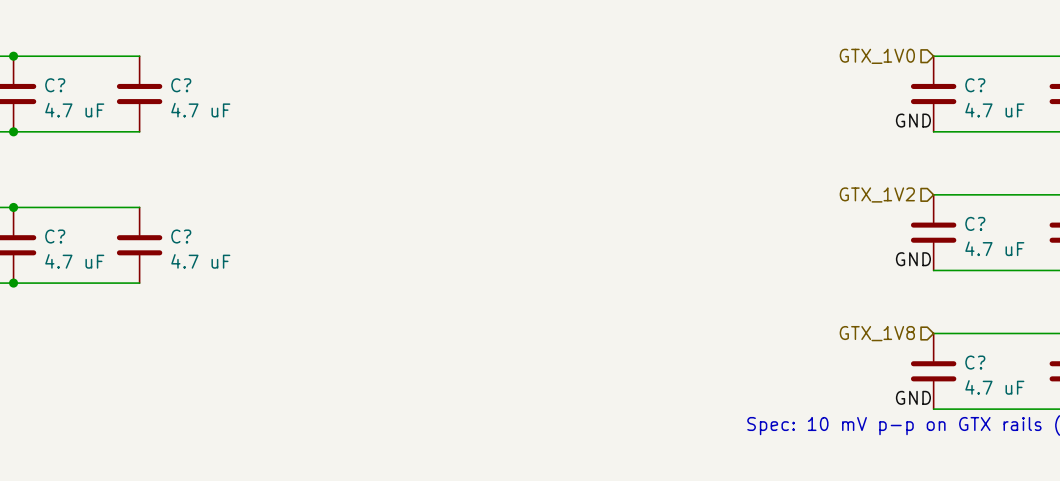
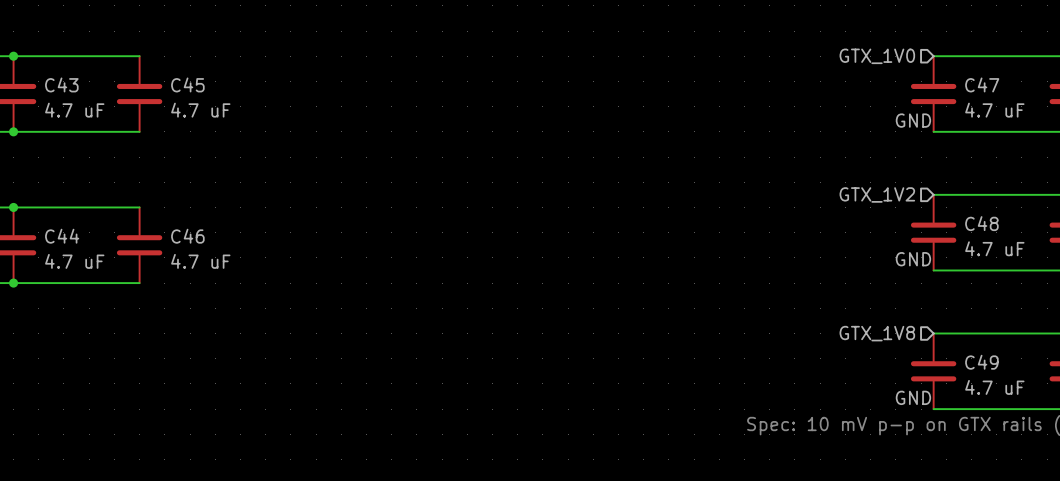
C? name: C? (55, 85) -> C43 (61, 84)
C? name: C? (181, 85) -> C45 (187, 84)
C? name: C? (975, 85) -> C47 (982, 84)
C? name: C? (975, 223) -> C48 (981, 223)
C? name: C? (55, 236) -> C44 (62, 236)
C? name: C? (181, 236) -> C46 (187, 236)
C? name: C? (975, 362) -> C49 (981, 362)

